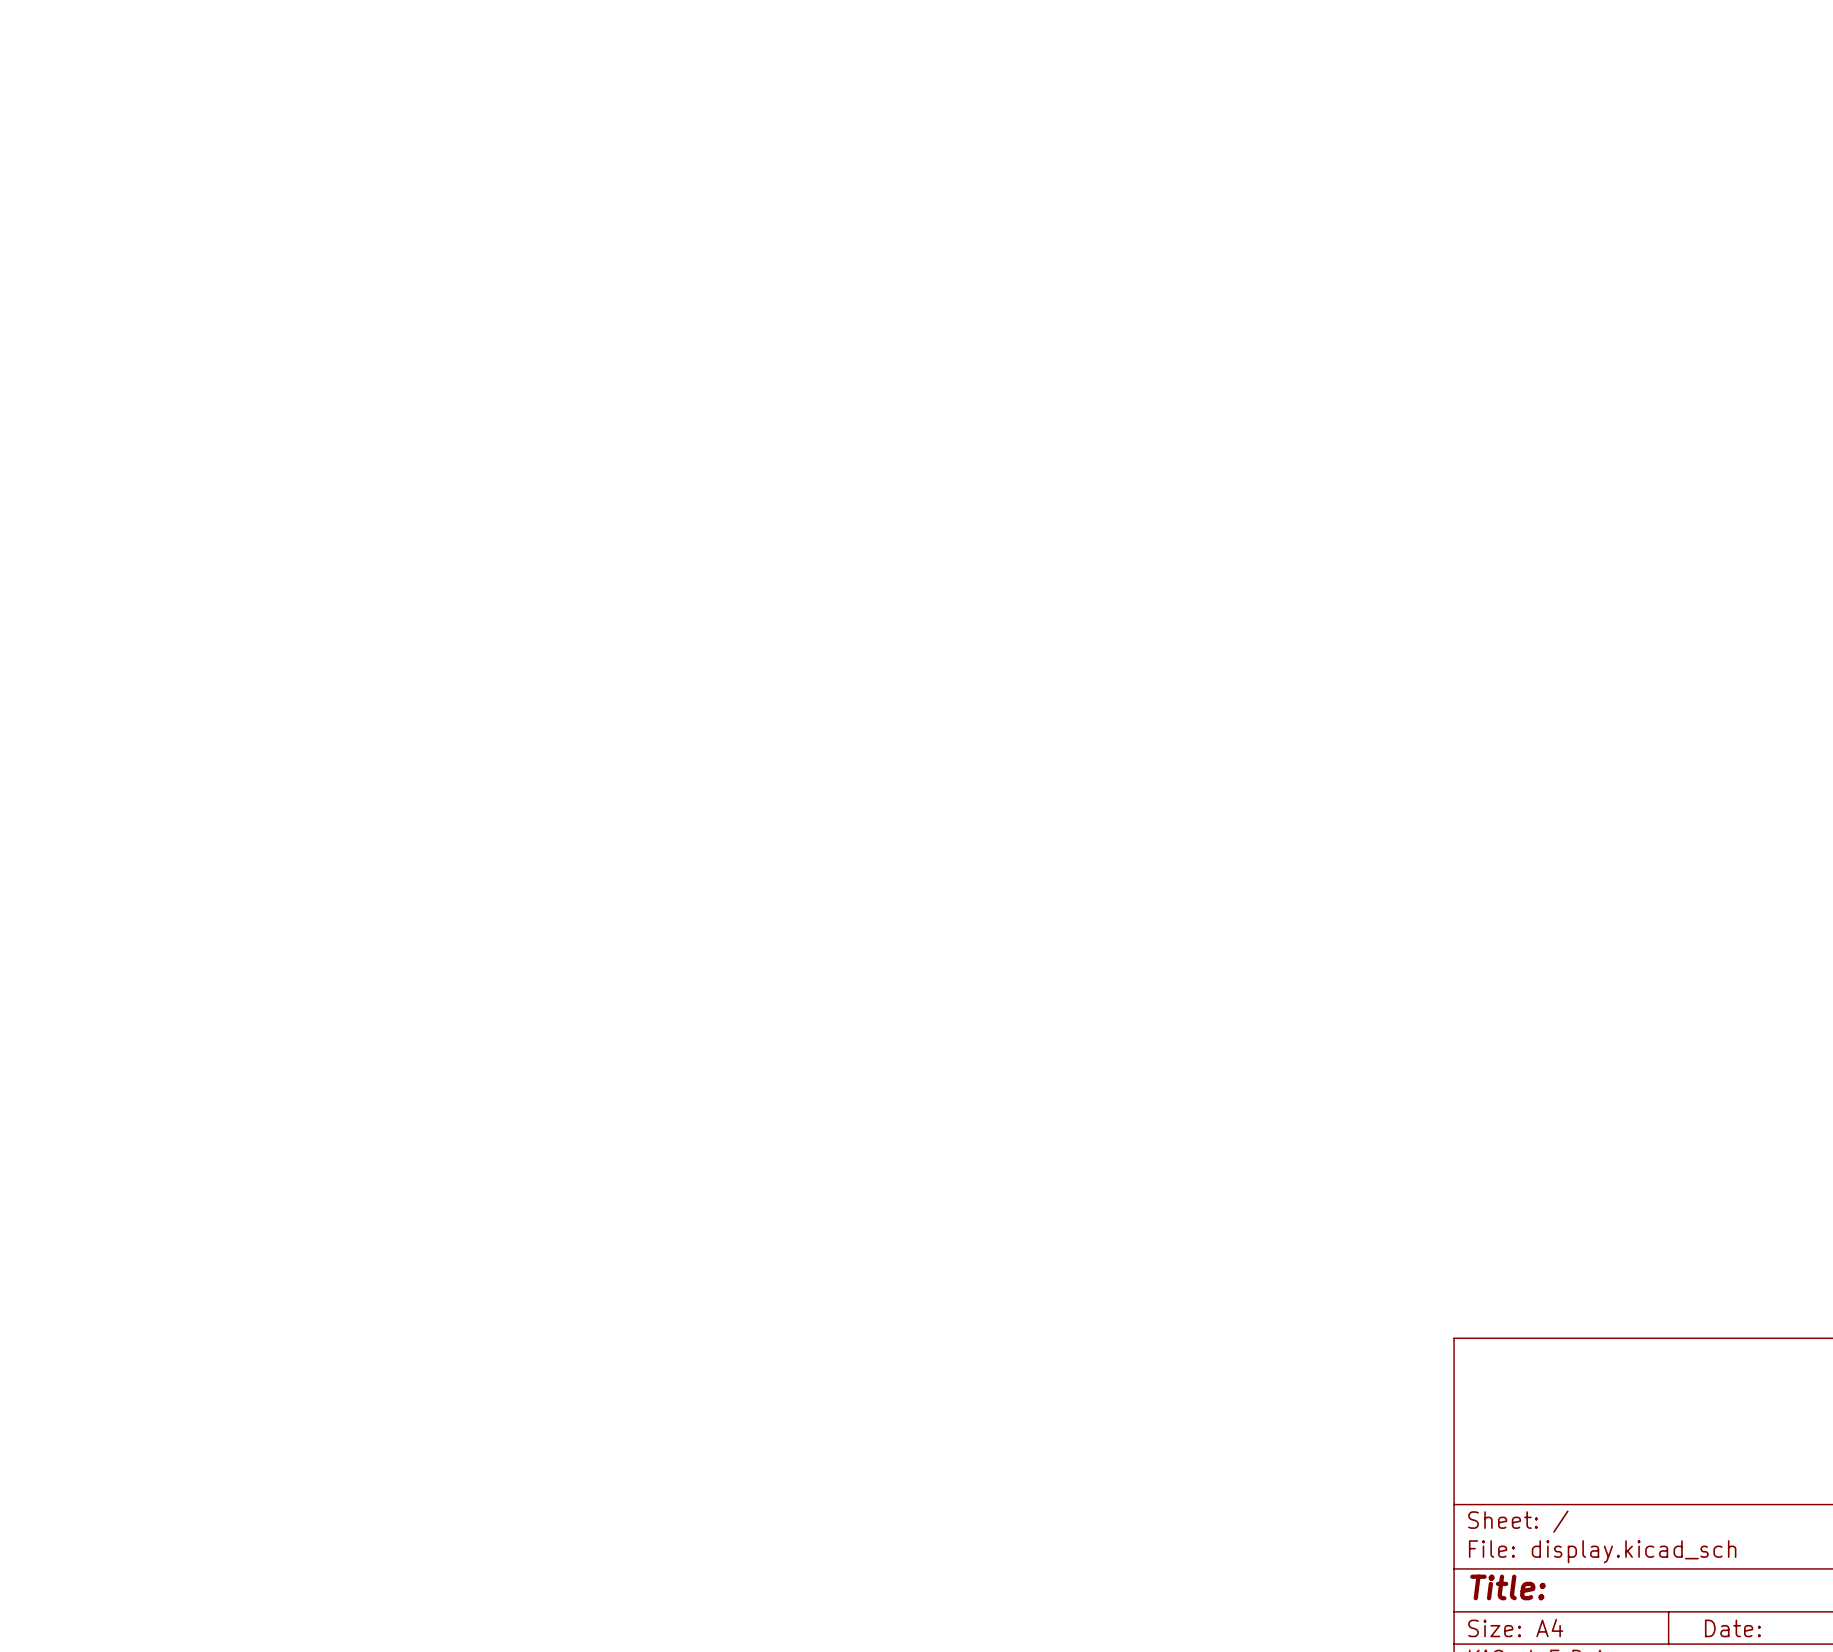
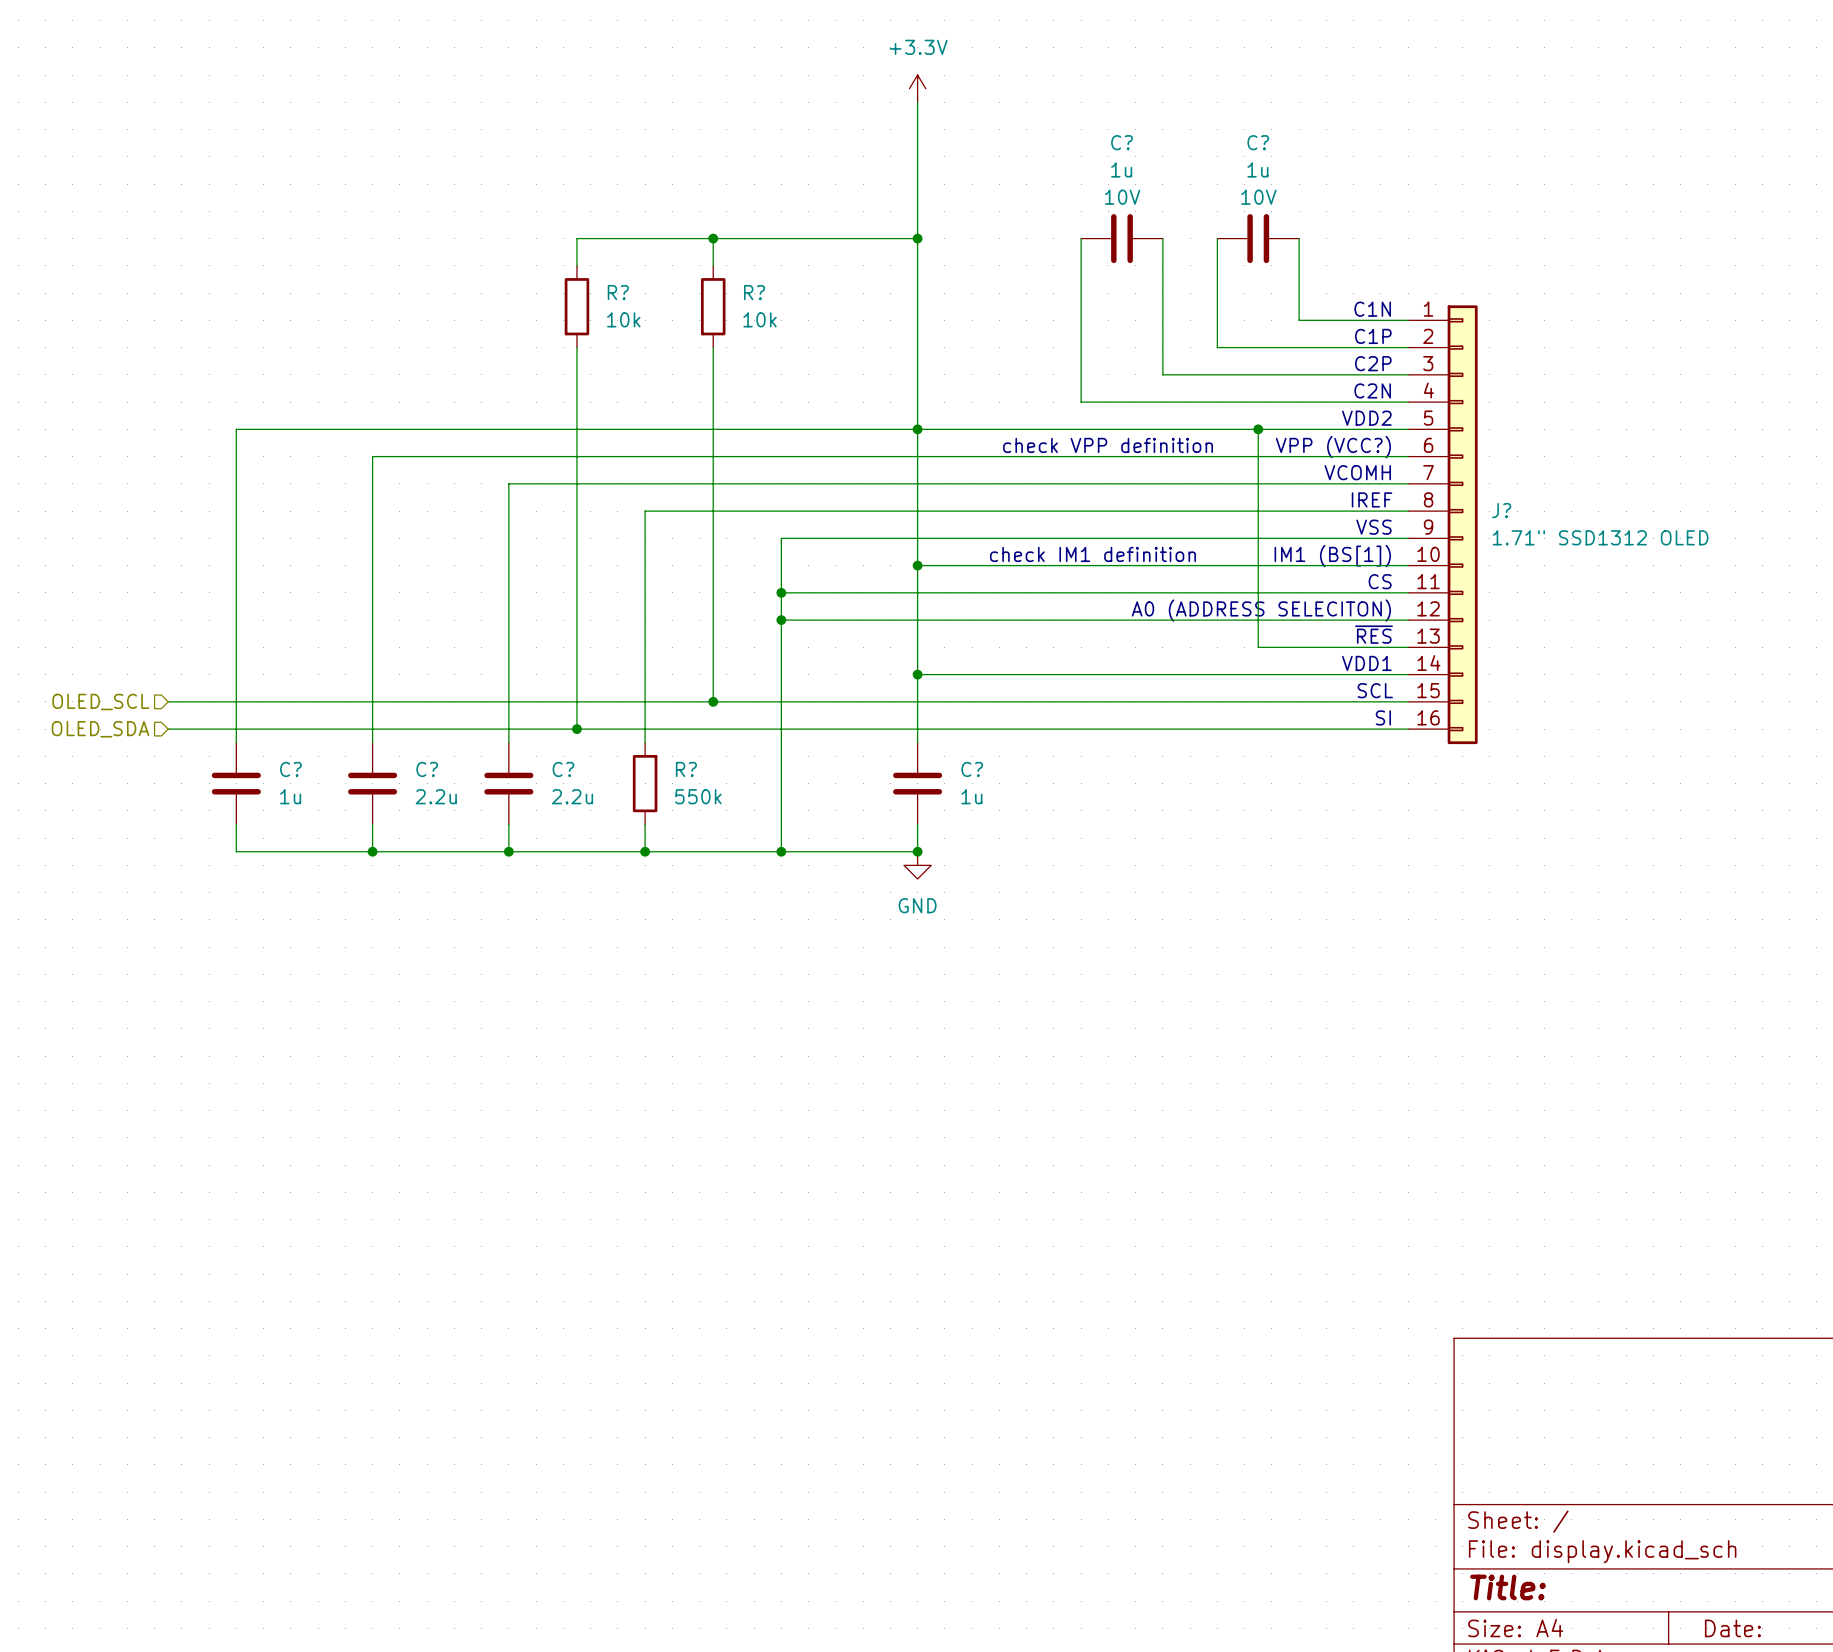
power symbol: none -> +3.3V (917, 88)
wire: none -> (917, 102) (917, 742)
wire: none -> (713, 238) (713, 265)
junction: none -> (713, 238)
wire: none -> (917, 238) (576, 238) (576, 265)
junction: none -> (917, 238)
wire: none -> (1081, 238) (1081, 402) (1408, 402)
C?: none -> 1u (1122, 238)
wire: none -> (1162, 238) (1162, 374) (1408, 374)
wire: none -> (1217, 238) (1217, 347) (1408, 347)
C?: none -> 1u (1258, 238)
wire: none -> (1299, 238) (1299, 320) (1408, 320)
R?: none -> 10k (576, 306)
R?: none -> 10k (713, 306)
text: none -> C1N (1372, 309)
text: none -> C1P (1373, 336)
wire: none -> (576, 347) (576, 729)
wire: none -> (713, 347) (713, 701)
text: none -> C2P (1373, 363)
text: none -> C2N (1372, 390)
text: none -> VDD2 (1366, 418)
junction: none -> (917, 429)
wire: none -> (1258, 429) (1258, 647) (1408, 647)
junction: none -> (1258, 429)
wire: none -> (1408, 429) (236, 429) (236, 742)
text: none -> check VPP definition (1108, 445)
text: none -> VPP (VCC?) (1333, 447)
wire: none -> (1408, 456) (372, 456) (372, 742)
text: none -> VCOMH (1357, 472)
wire: none -> (1408, 483) (508, 483) (508, 742)
text: none -> IREF (1372, 499)
wire: none -> (1408, 511) (645, 511) (645, 742)
J?: none -> 1.71" SSD1312 OLED (1442, 524)
text: none -> VSS (1373, 527)
wire: none -> (1408, 538) (781, 538) (781, 851)
text: none -> check IM1 definition (1092, 554)
text: none -> IM1 (BS[1]) (1332, 556)
wire: none -> (917, 565) (1408, 565)
junction: none -> (917, 565)
text: none -> CS (1380, 581)
wire: none -> (781, 592) (1408, 592)
junction: none -> (781, 592)
text: none -> A0 (ADDRESS SELECITON) (1261, 610)
wire: none -> (781, 620) (1408, 620)
junction: none -> (781, 620)
text: none -> ~{RES} (1373, 634)
text: none -> VDD1 (1366, 663)
wire: none -> (917, 674) (1408, 674)
junction: none -> (917, 674)
text: none -> SCL (1375, 690)
hierarchical label: none -> OLED_SCL (100, 701)
wire: none -> (168, 701) (1408, 701)
junction: none -> (713, 701)
text: none -> SI (1383, 717)
hierarchical label: none -> OLED_SDA (100, 729)
wire: none -> (168, 729) (1408, 729)
junction: none -> (576, 729)
C?: none -> 1u (236, 783)
C?: none -> 2.2u (372, 783)
C?: none -> 2.2u (508, 783)
R?: none -> 550k (645, 783)
C?: none -> 1u (917, 783)
wire: none -> (236, 824) (236, 851) (917, 851) (917, 824)
wire: none -> (372, 824) (372, 851)
wire: none -> (508, 824) (508, 851)
wire: none -> (645, 824) (645, 851)
junction: none -> (372, 851)
junction: none -> (508, 851)
junction: none -> (645, 851)
junction: none -> (781, 851)
junction: none -> (917, 851)
power symbol: none -> GND (917, 865)

